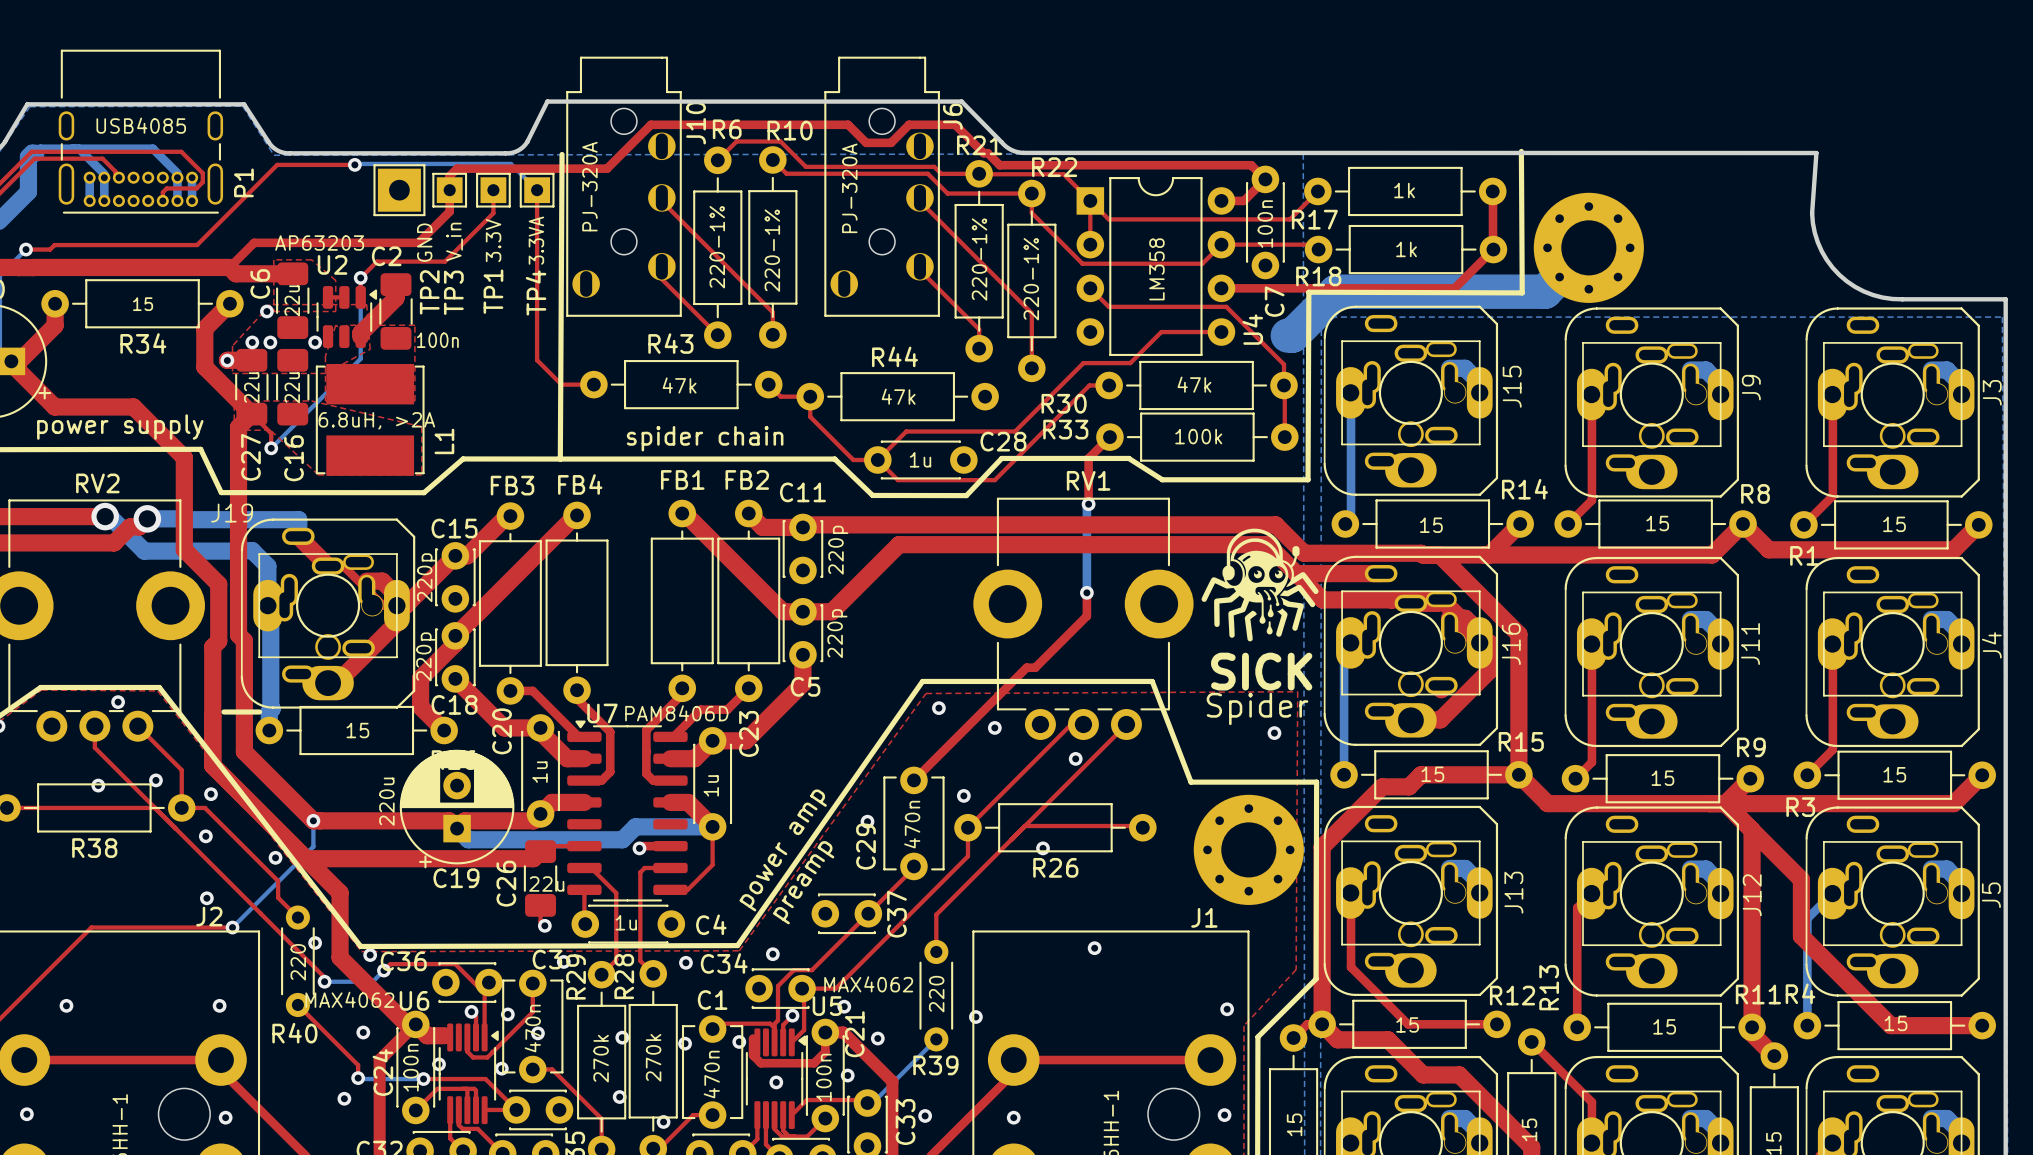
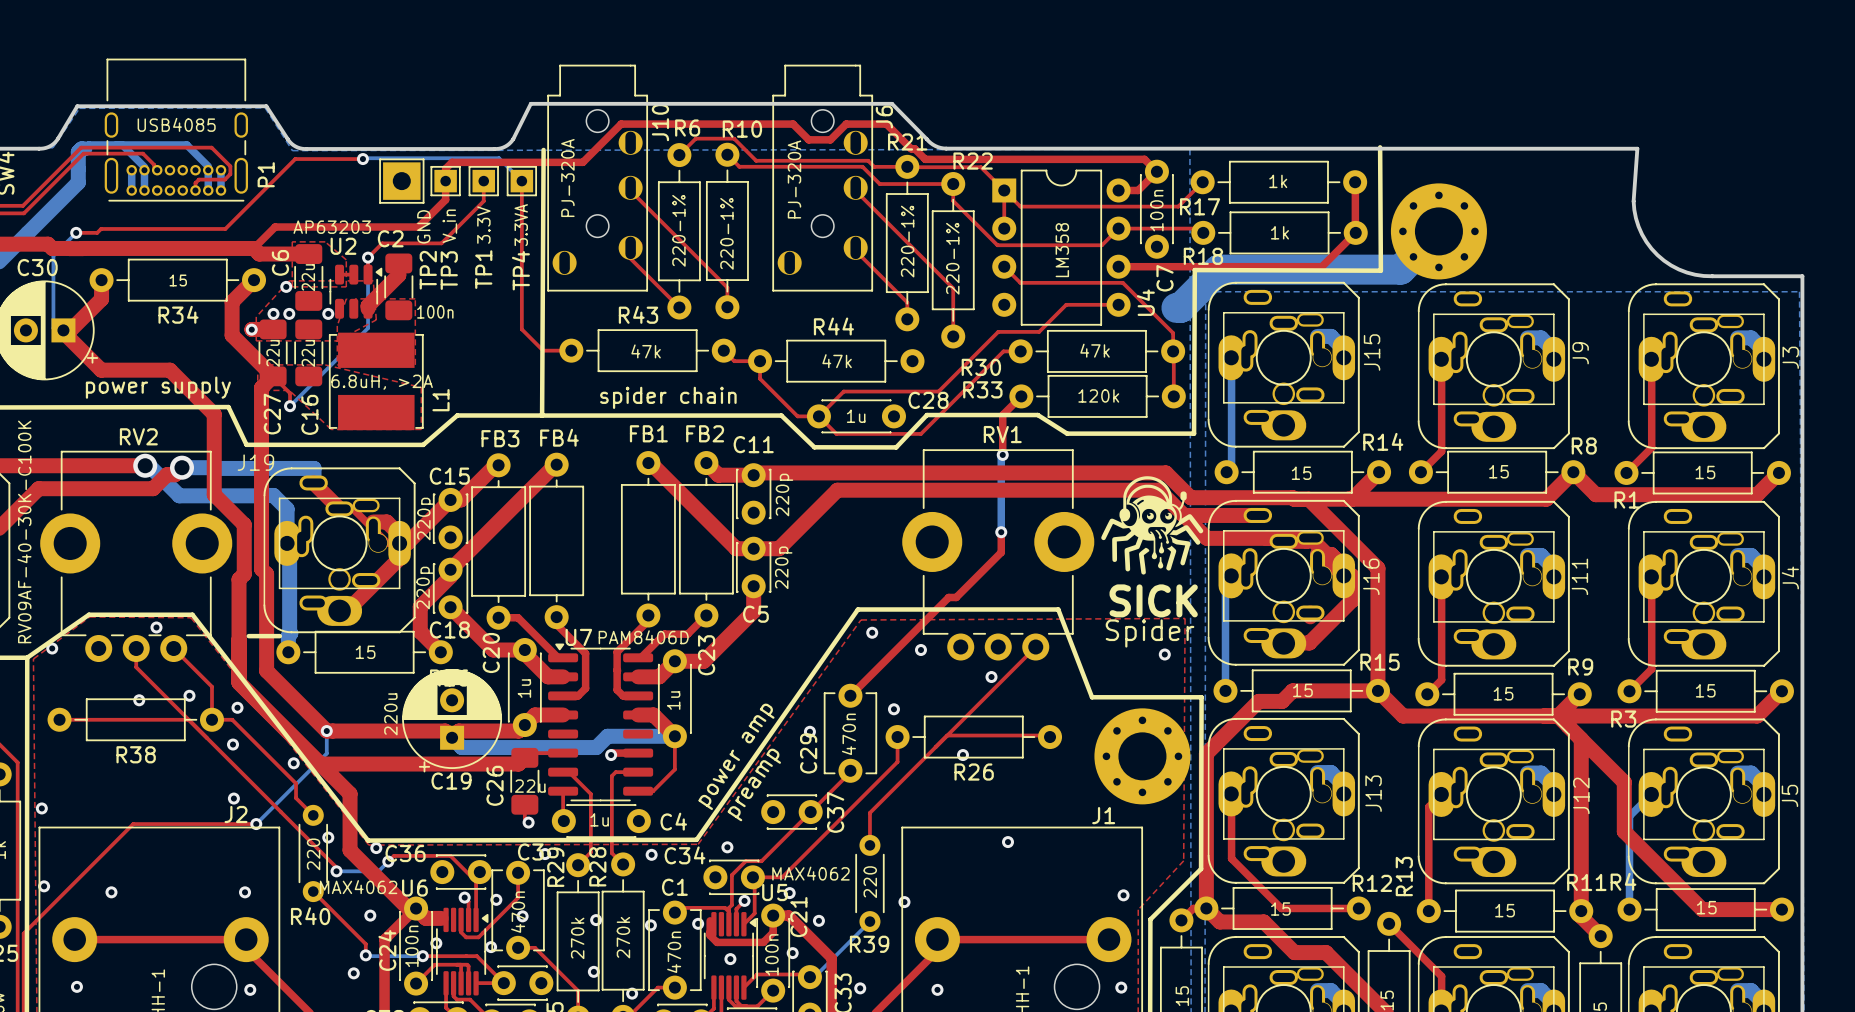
R33 value: 100k (1198, 436) -> 120k (1098, 395)
top track: (1083, 724) (1071, 724) (967, 827) -> none

